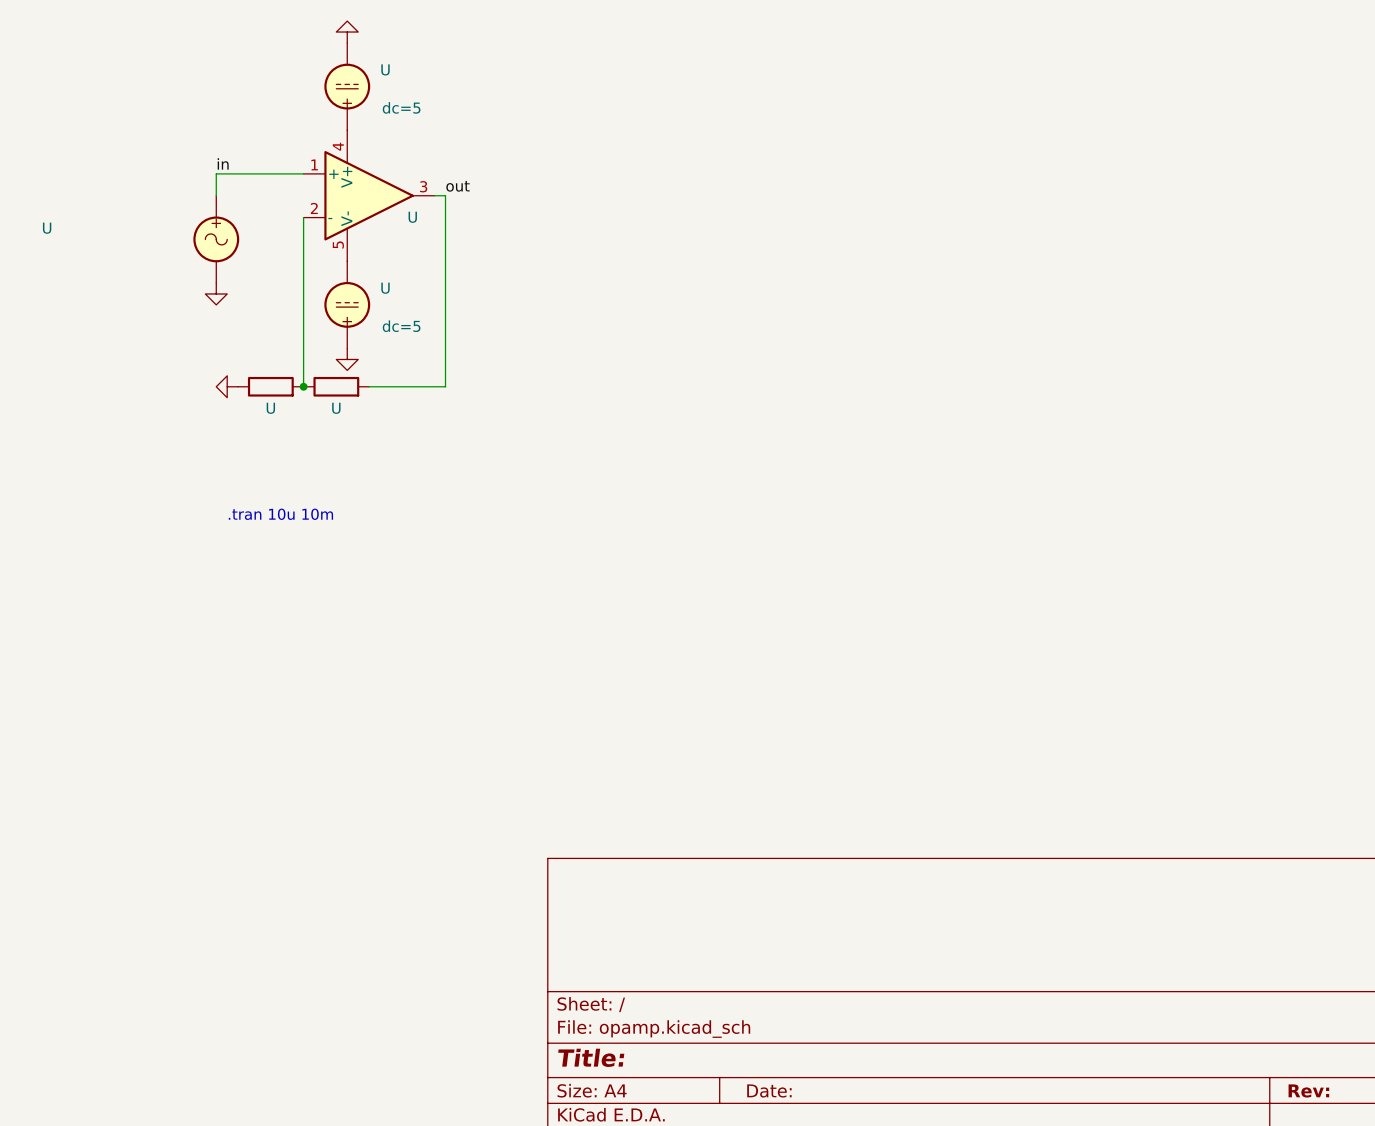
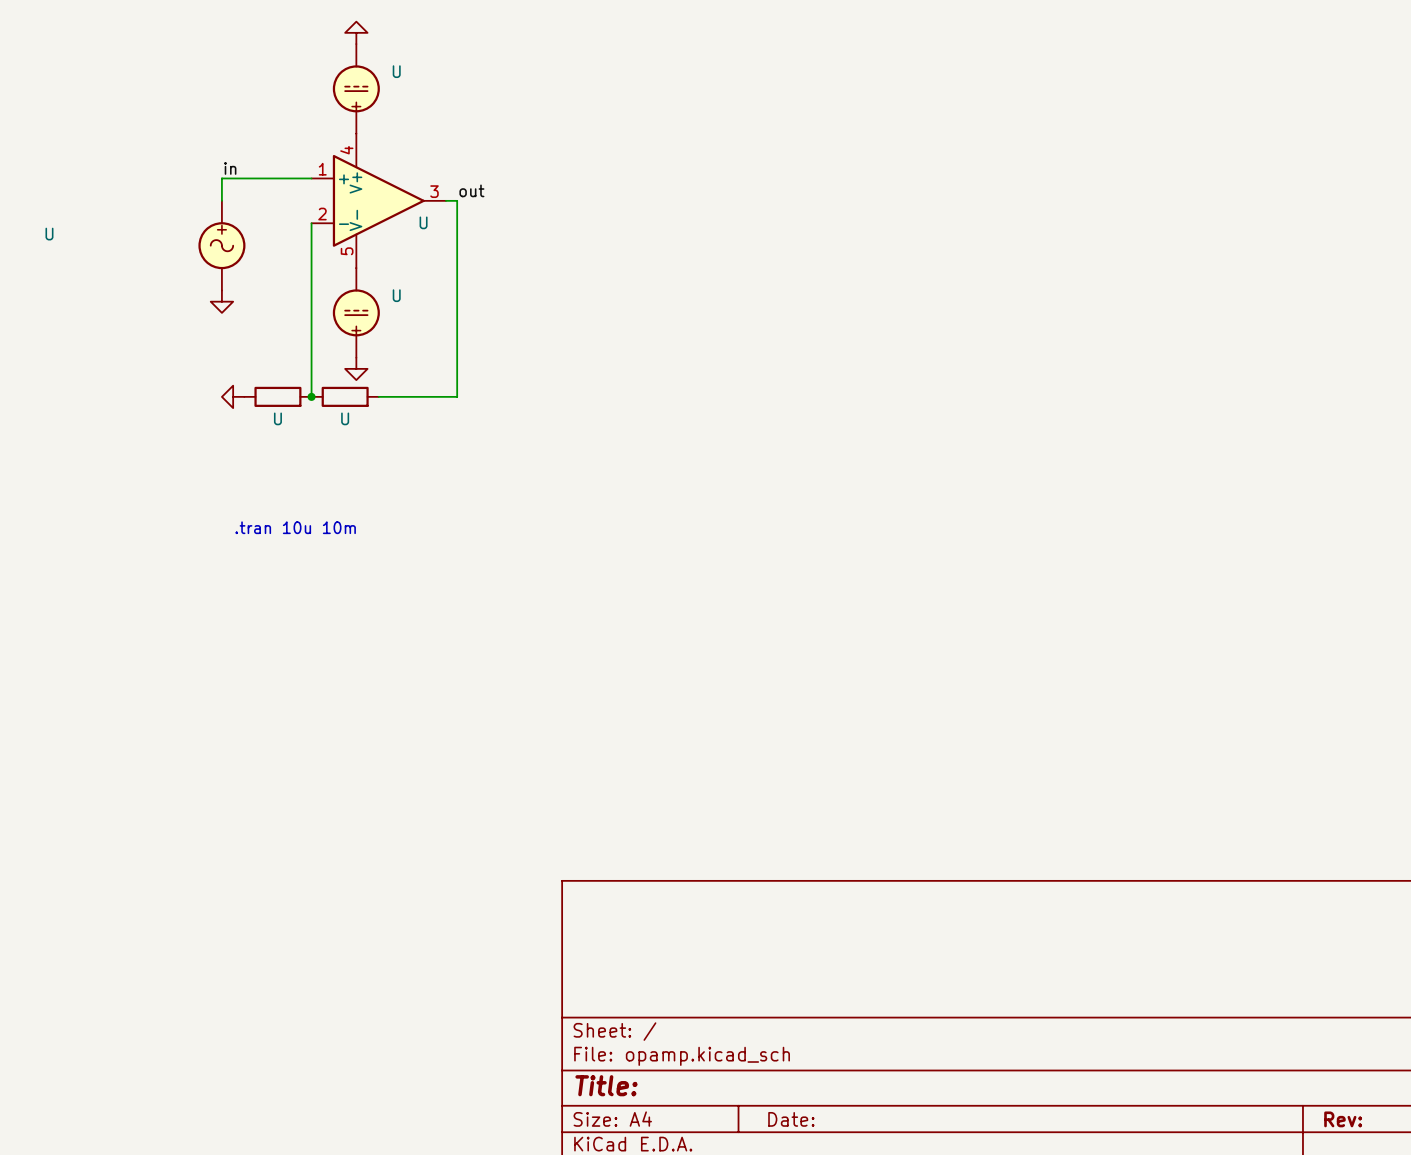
U text: dc=5 (401, 107) -> none
U text: dc=5 (401, 326) -> none

